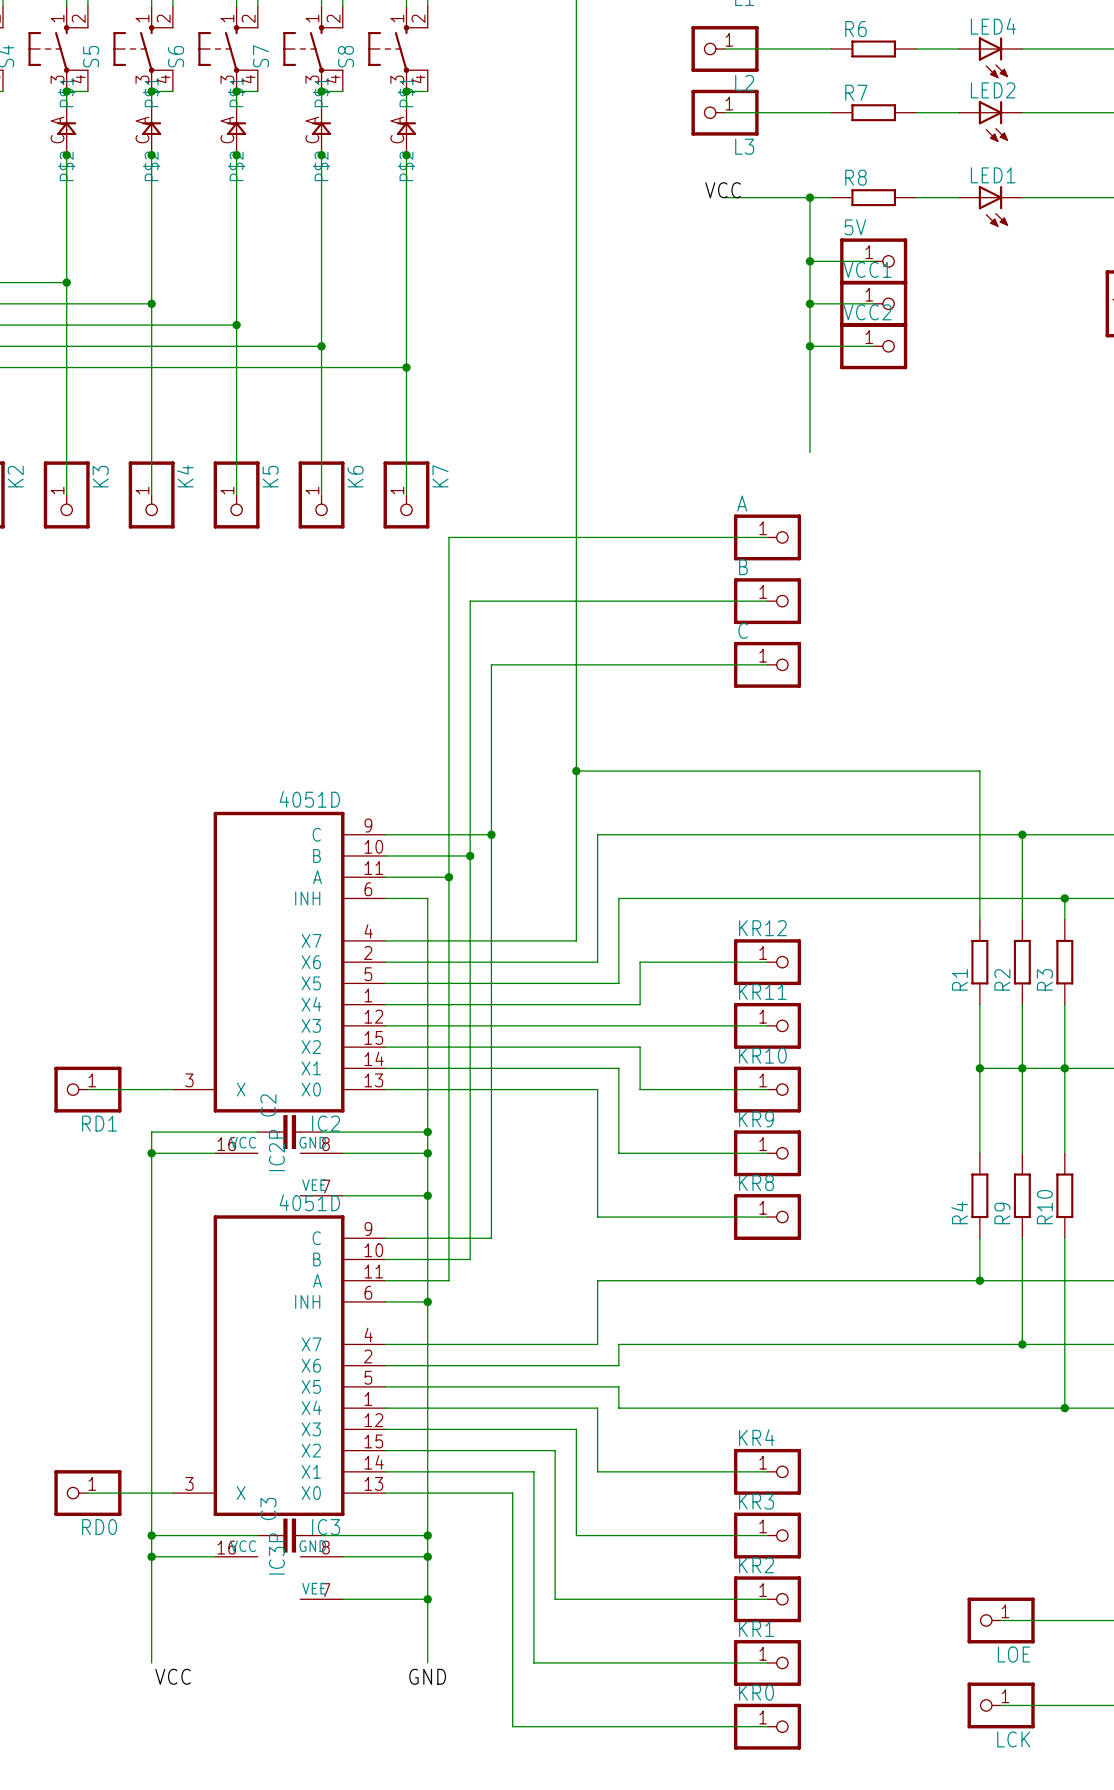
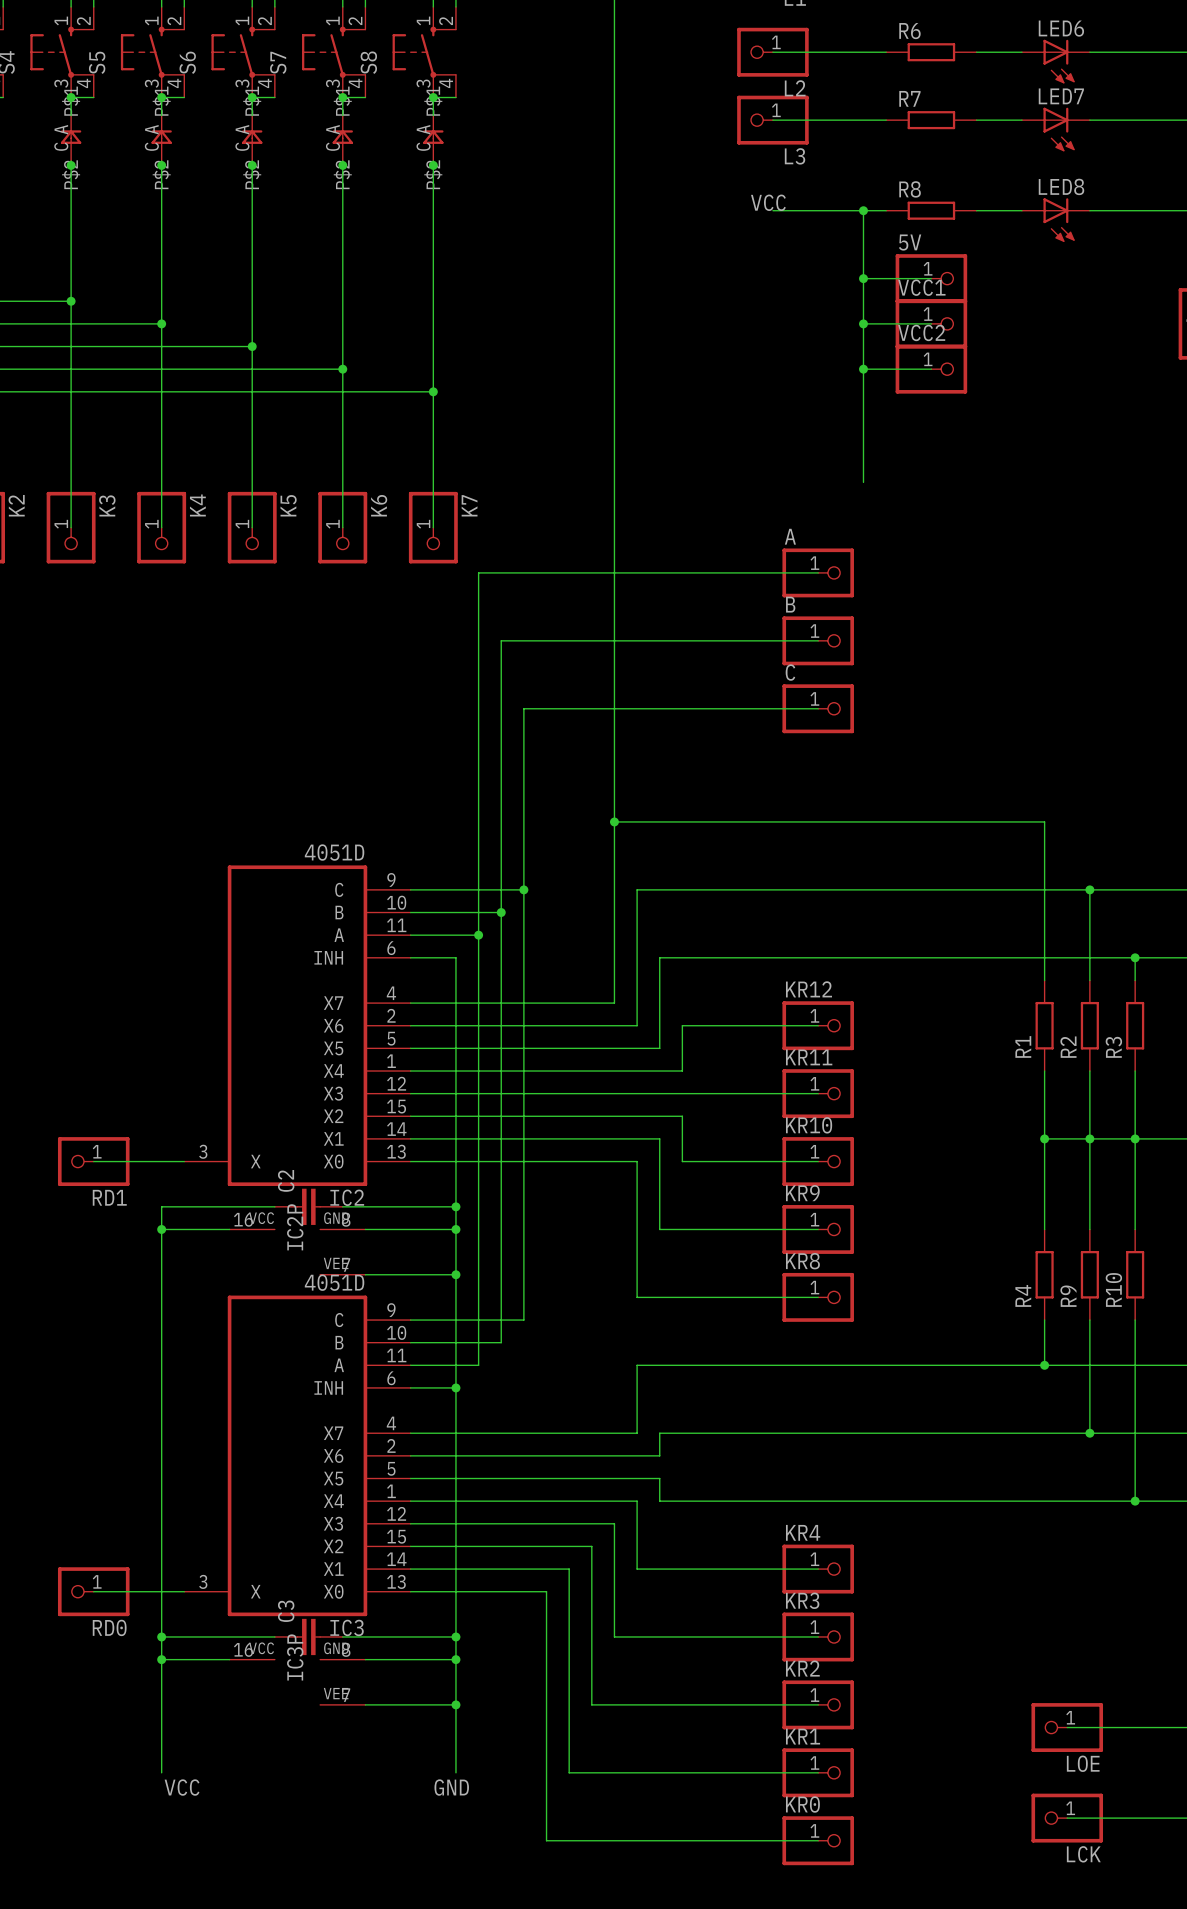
LED4 name: LED4 (993, 26) -> LED6 (1061, 28)
LED2 name: LED2 (993, 90) -> LED7 (1061, 96)
LED1 name: LED1 (993, 175) -> LED8 (1061, 186)

